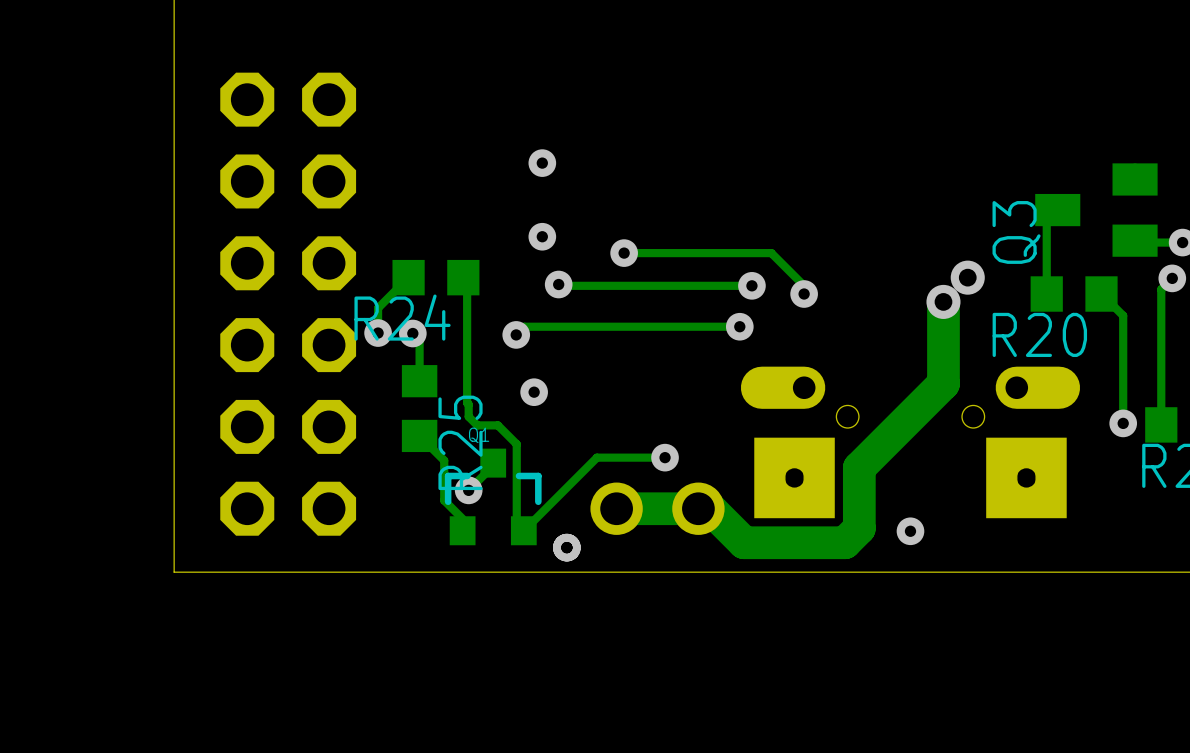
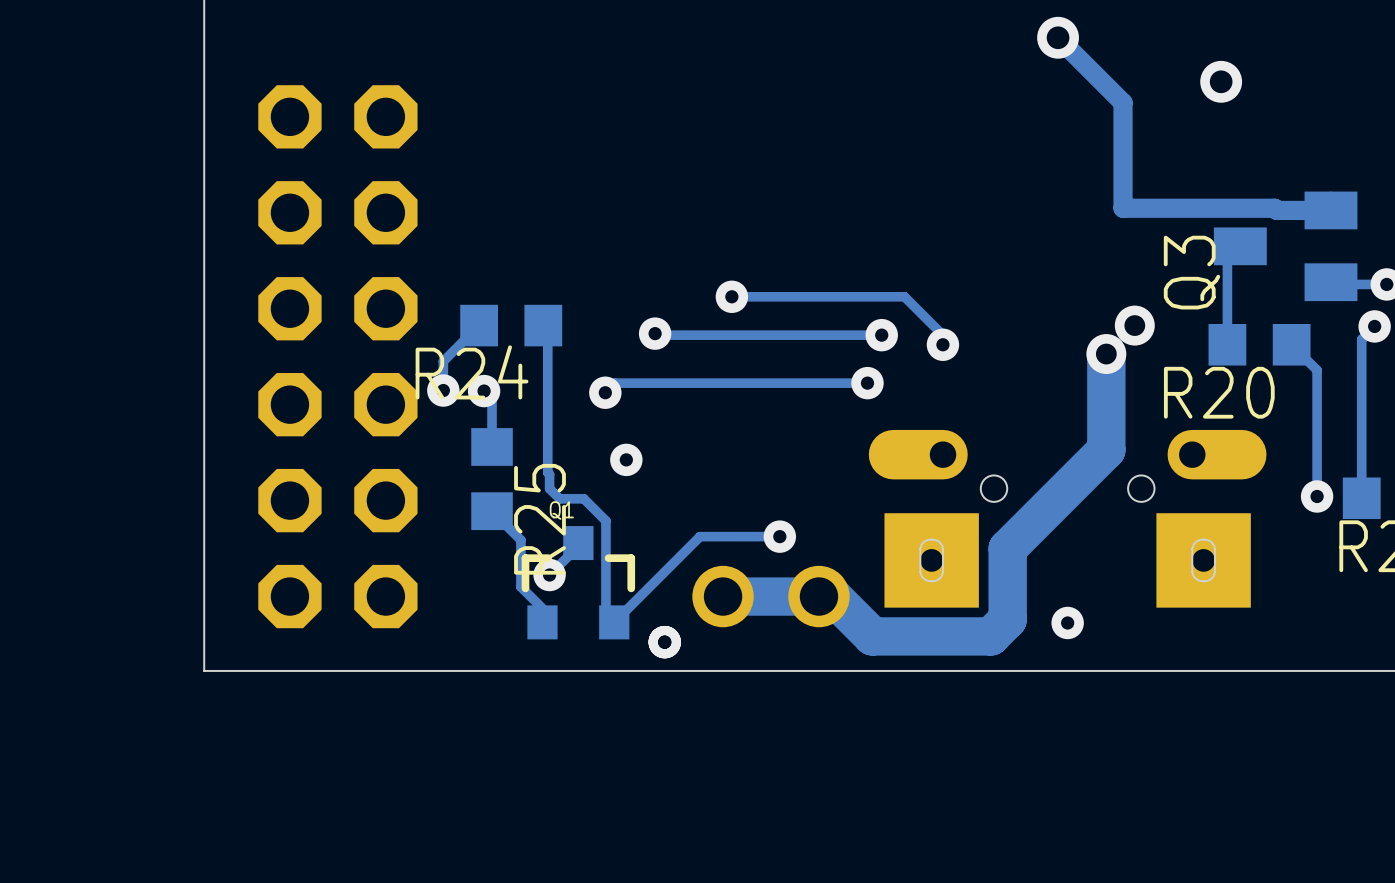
track: none -> (1058, 37) (1123, 102) (1123, 208) (1274, 208) (1276, 210) (1330, 210)
via: none -> (1058, 37)
via: none -> (1221, 81)
via: (542, 163) -> none
via: (542, 236) -> none

